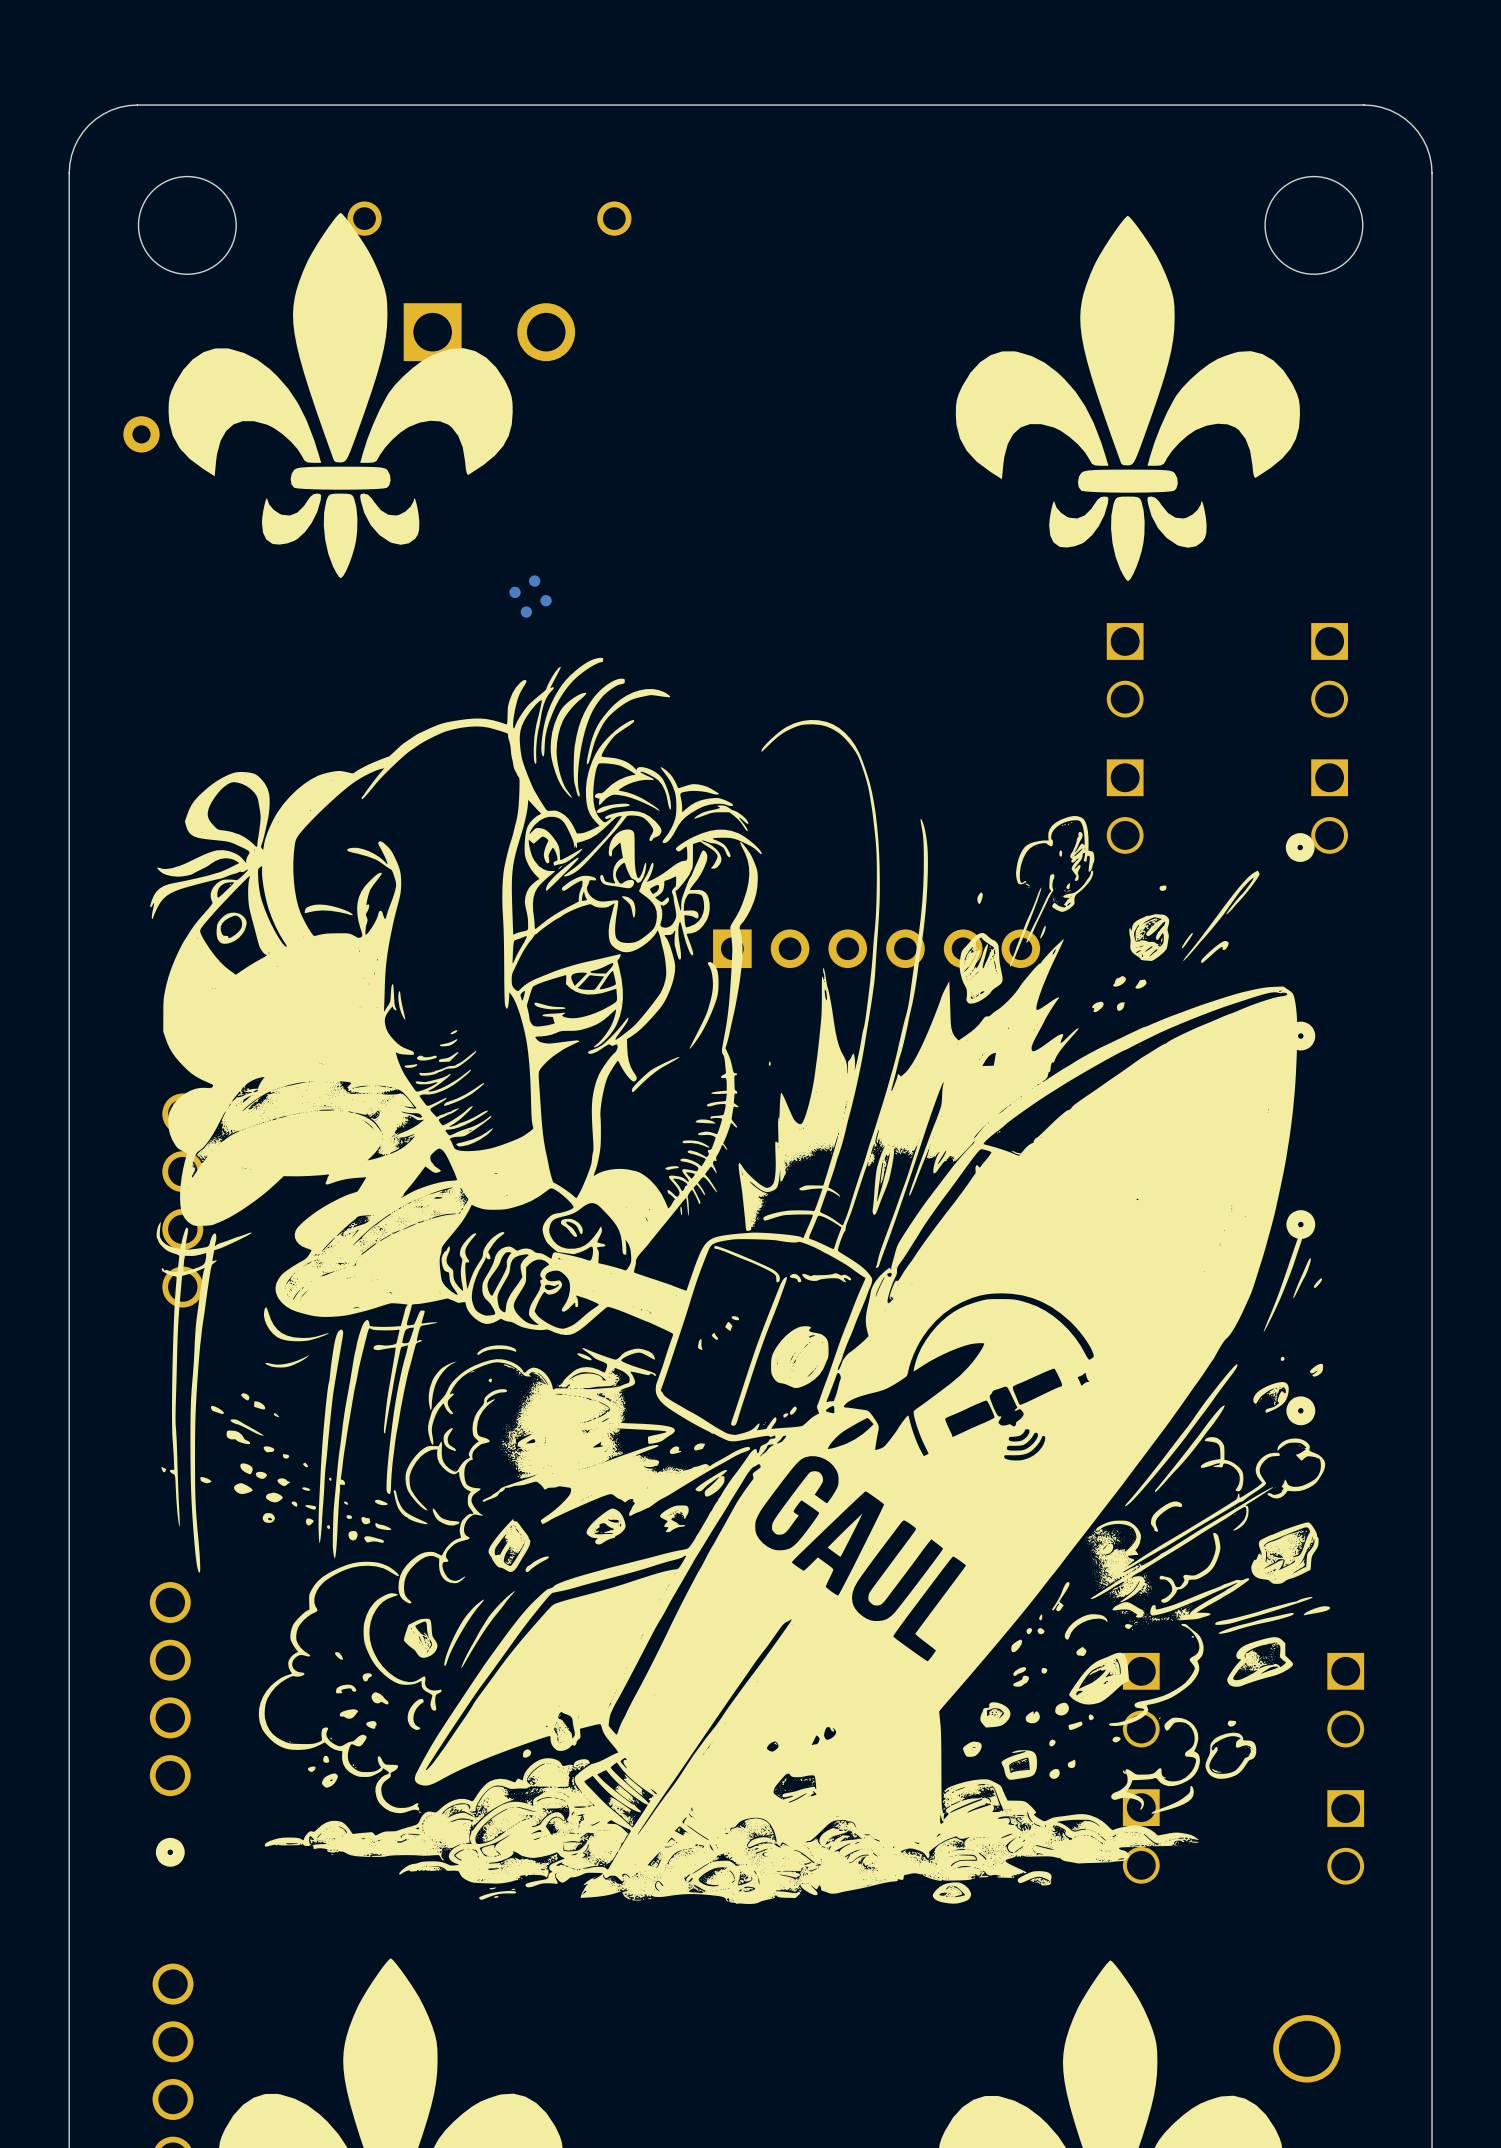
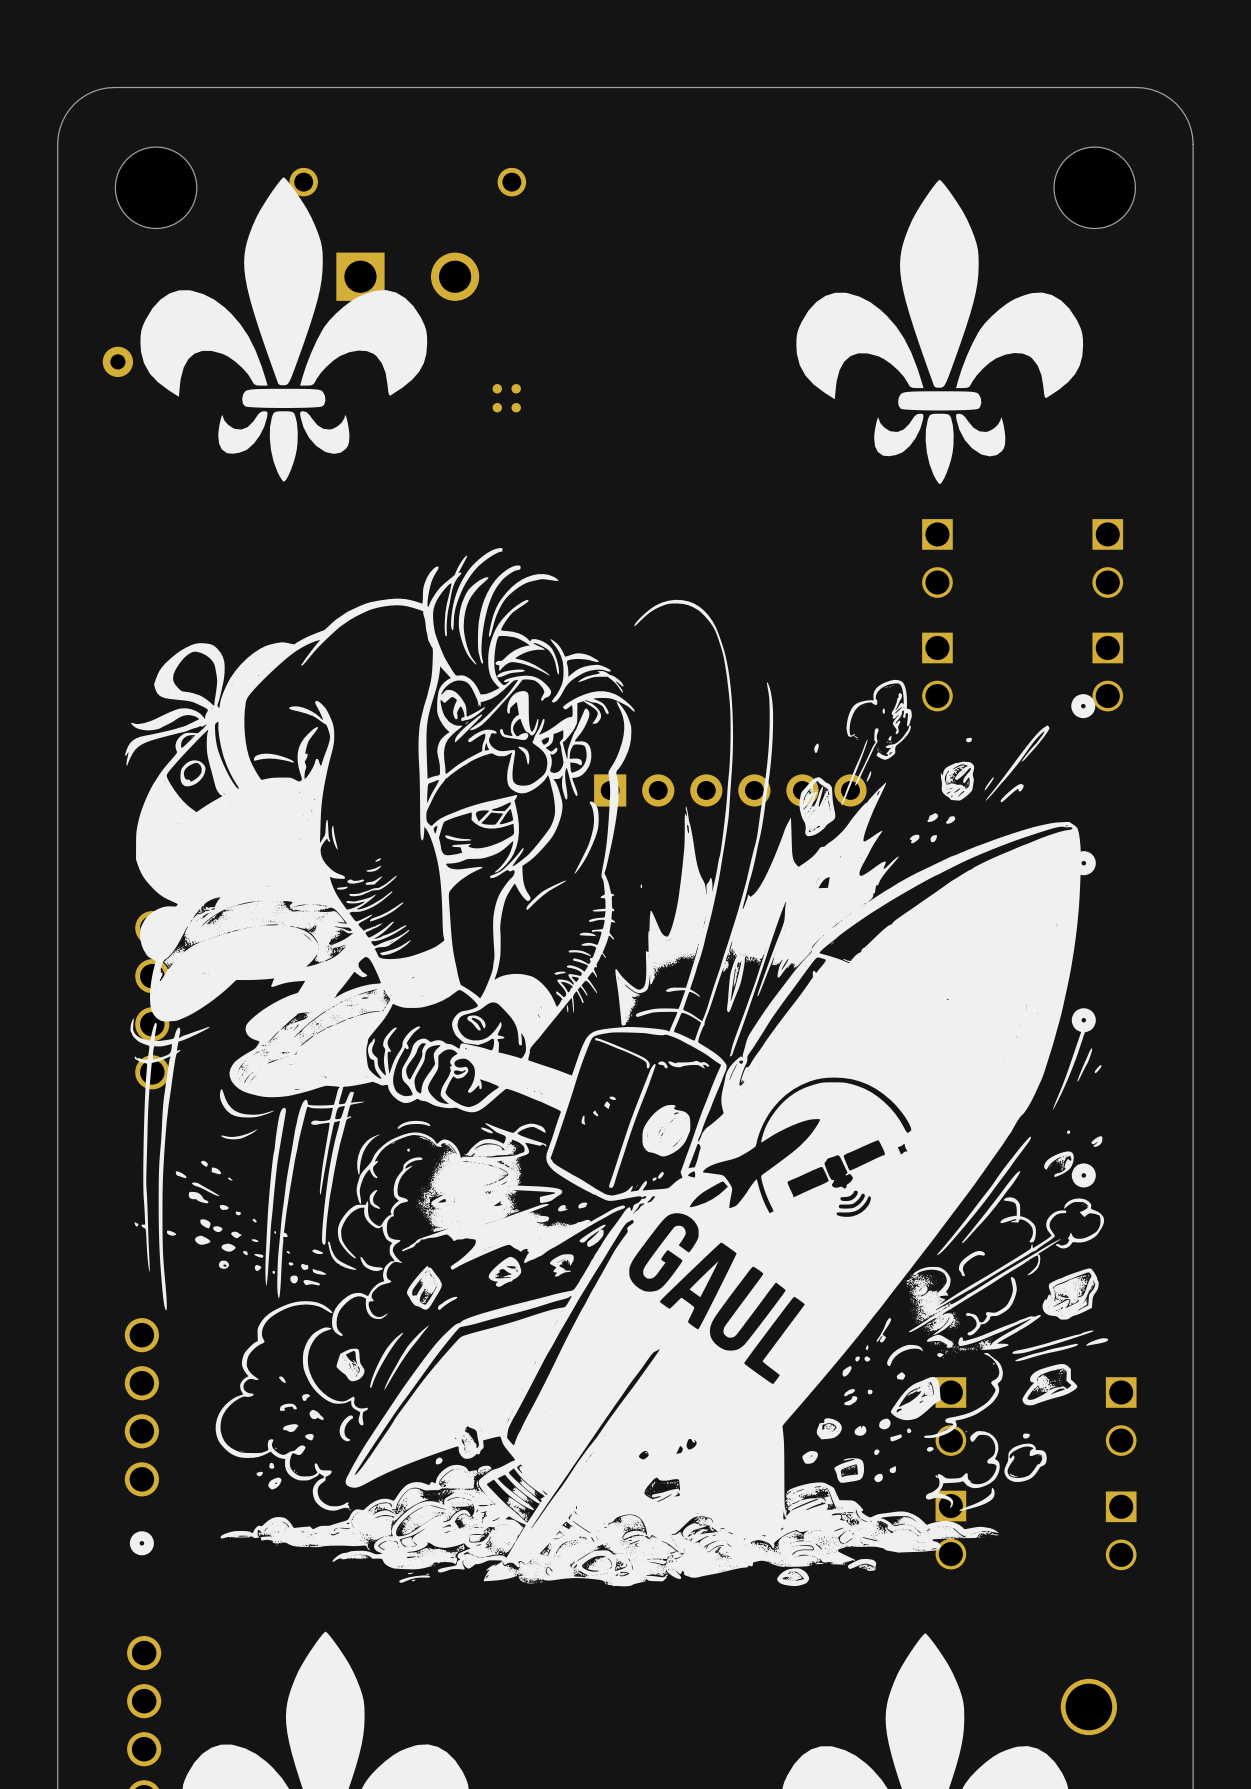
part: none -> (506, 398)
part: (530, 596) -> none

